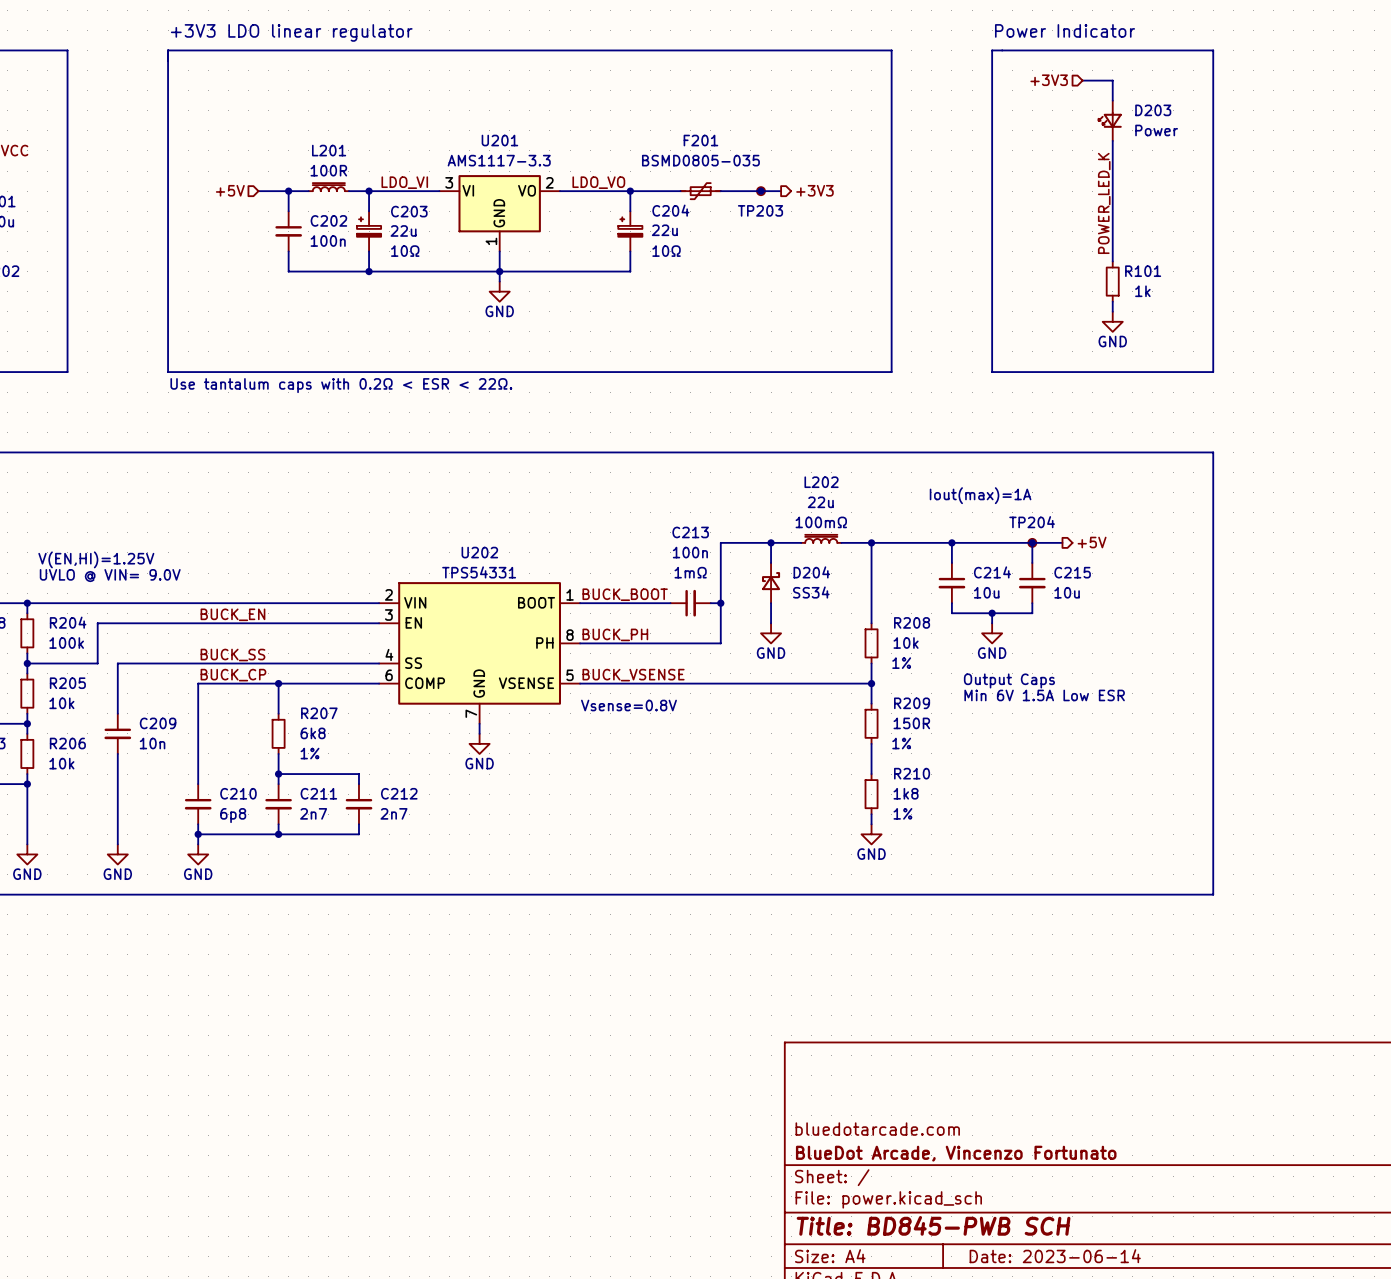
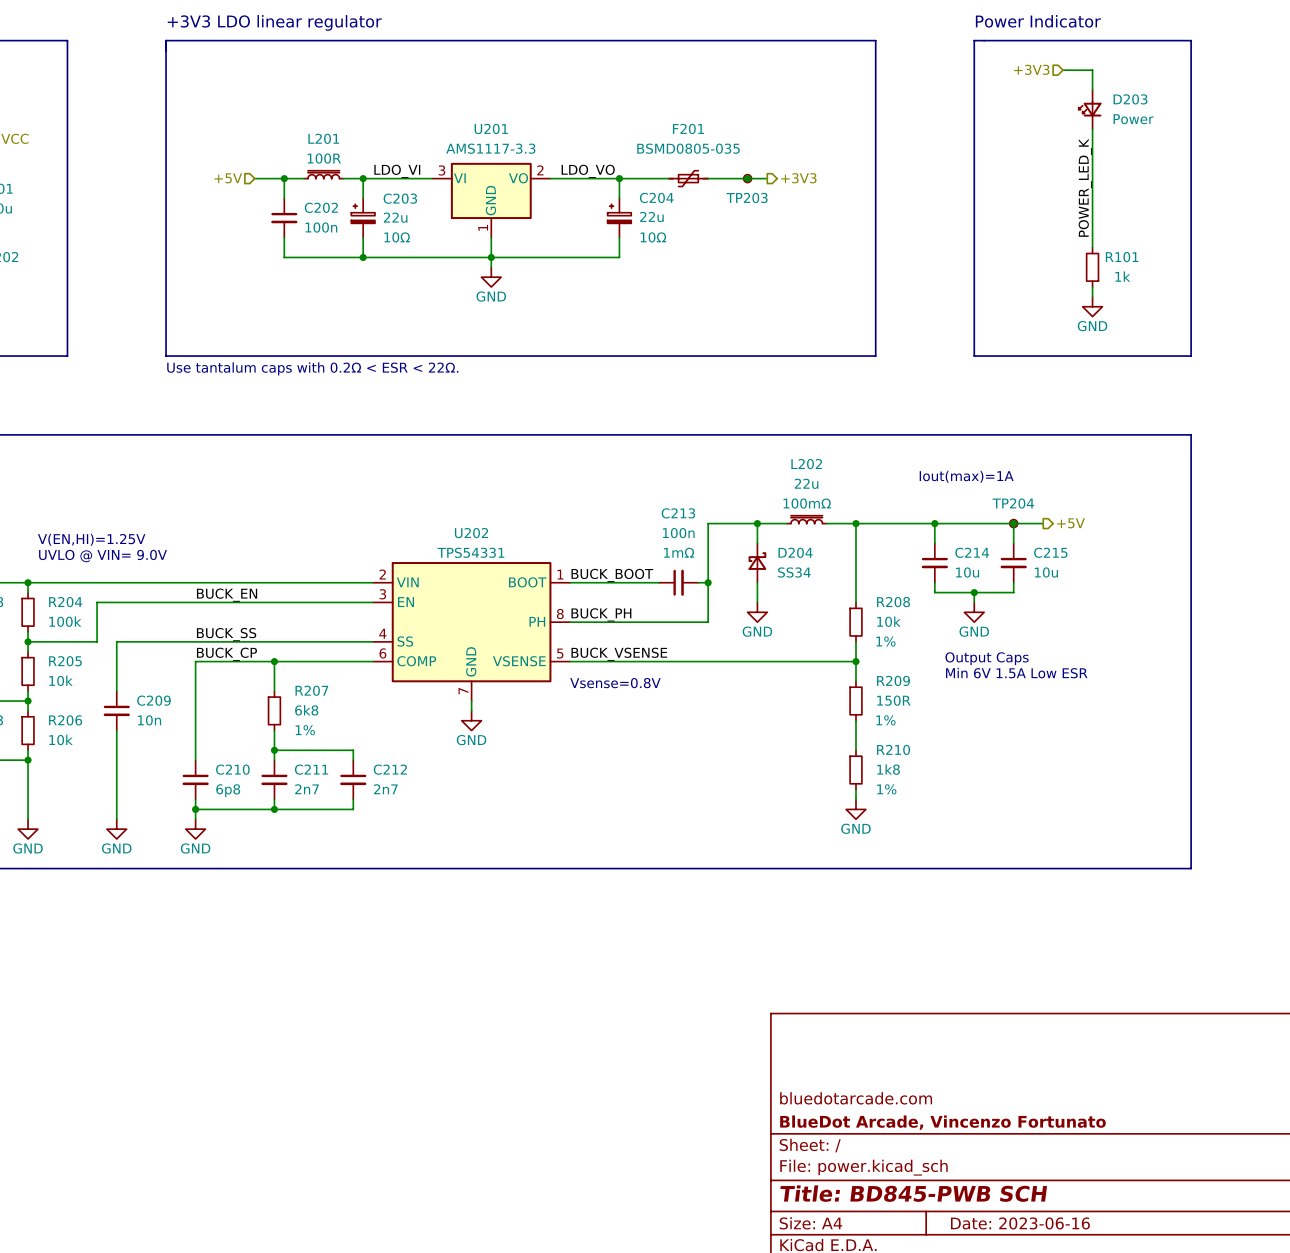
title block: Date: 2023-06-14 (1055, 1256) -> Date: 2023-06-16 (1020, 1223)

